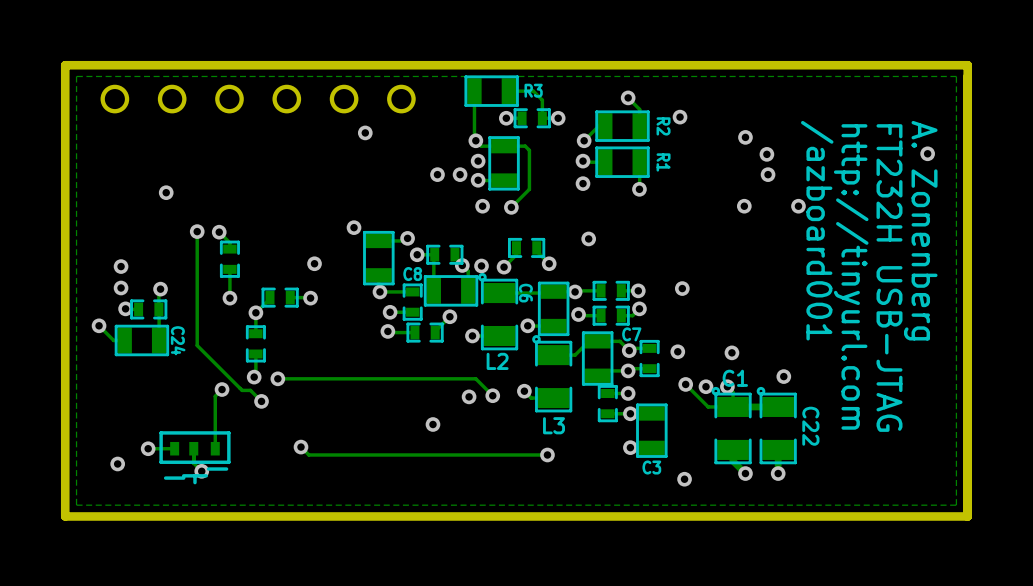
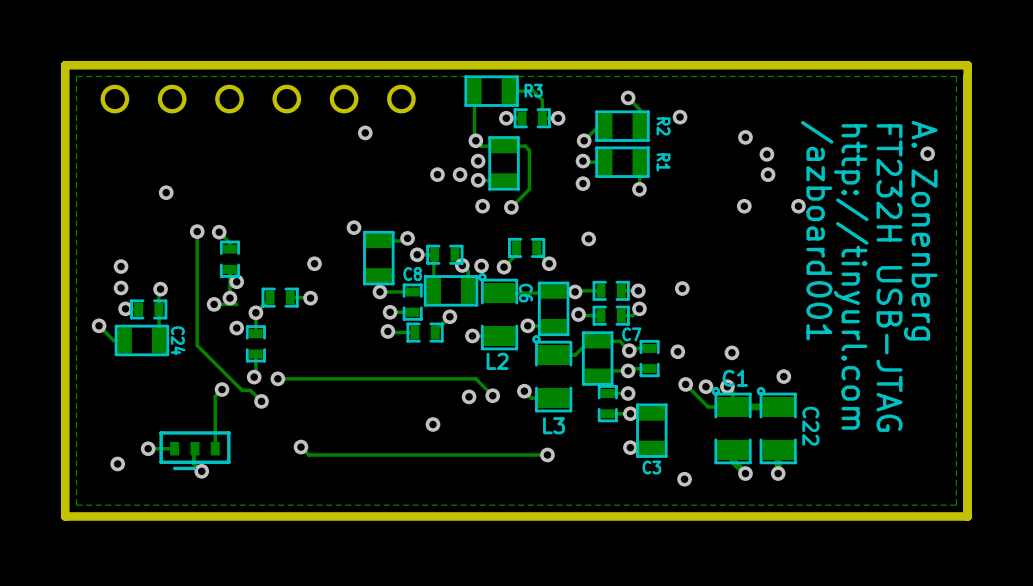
via: none -> (236, 281)
via: none -> (214, 304)
track: none -> (236, 304) (214, 304)
via: none -> (236, 328)
part footprint: [159, 431, 231, 485] -> [159, 431, 231, 471]

